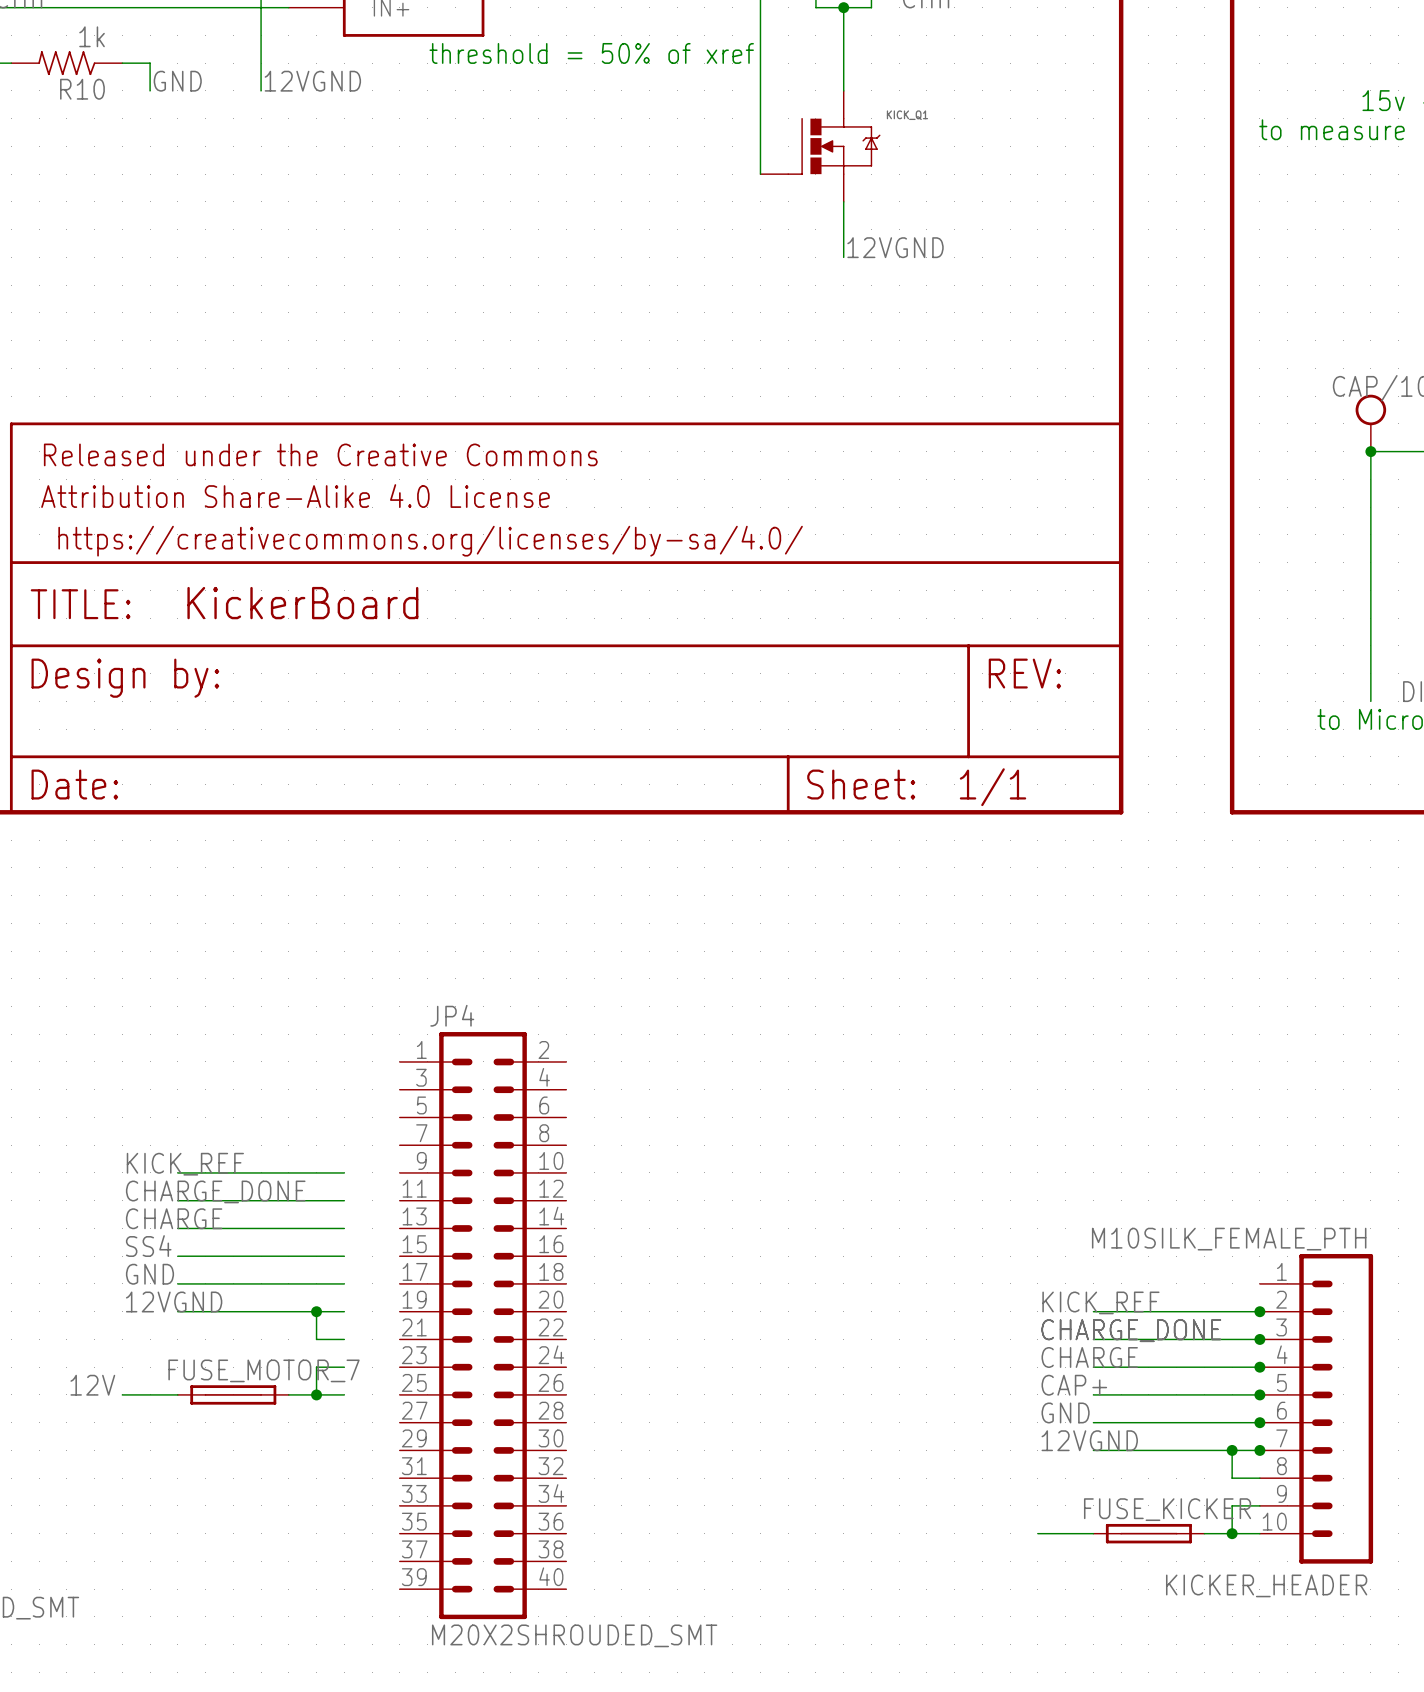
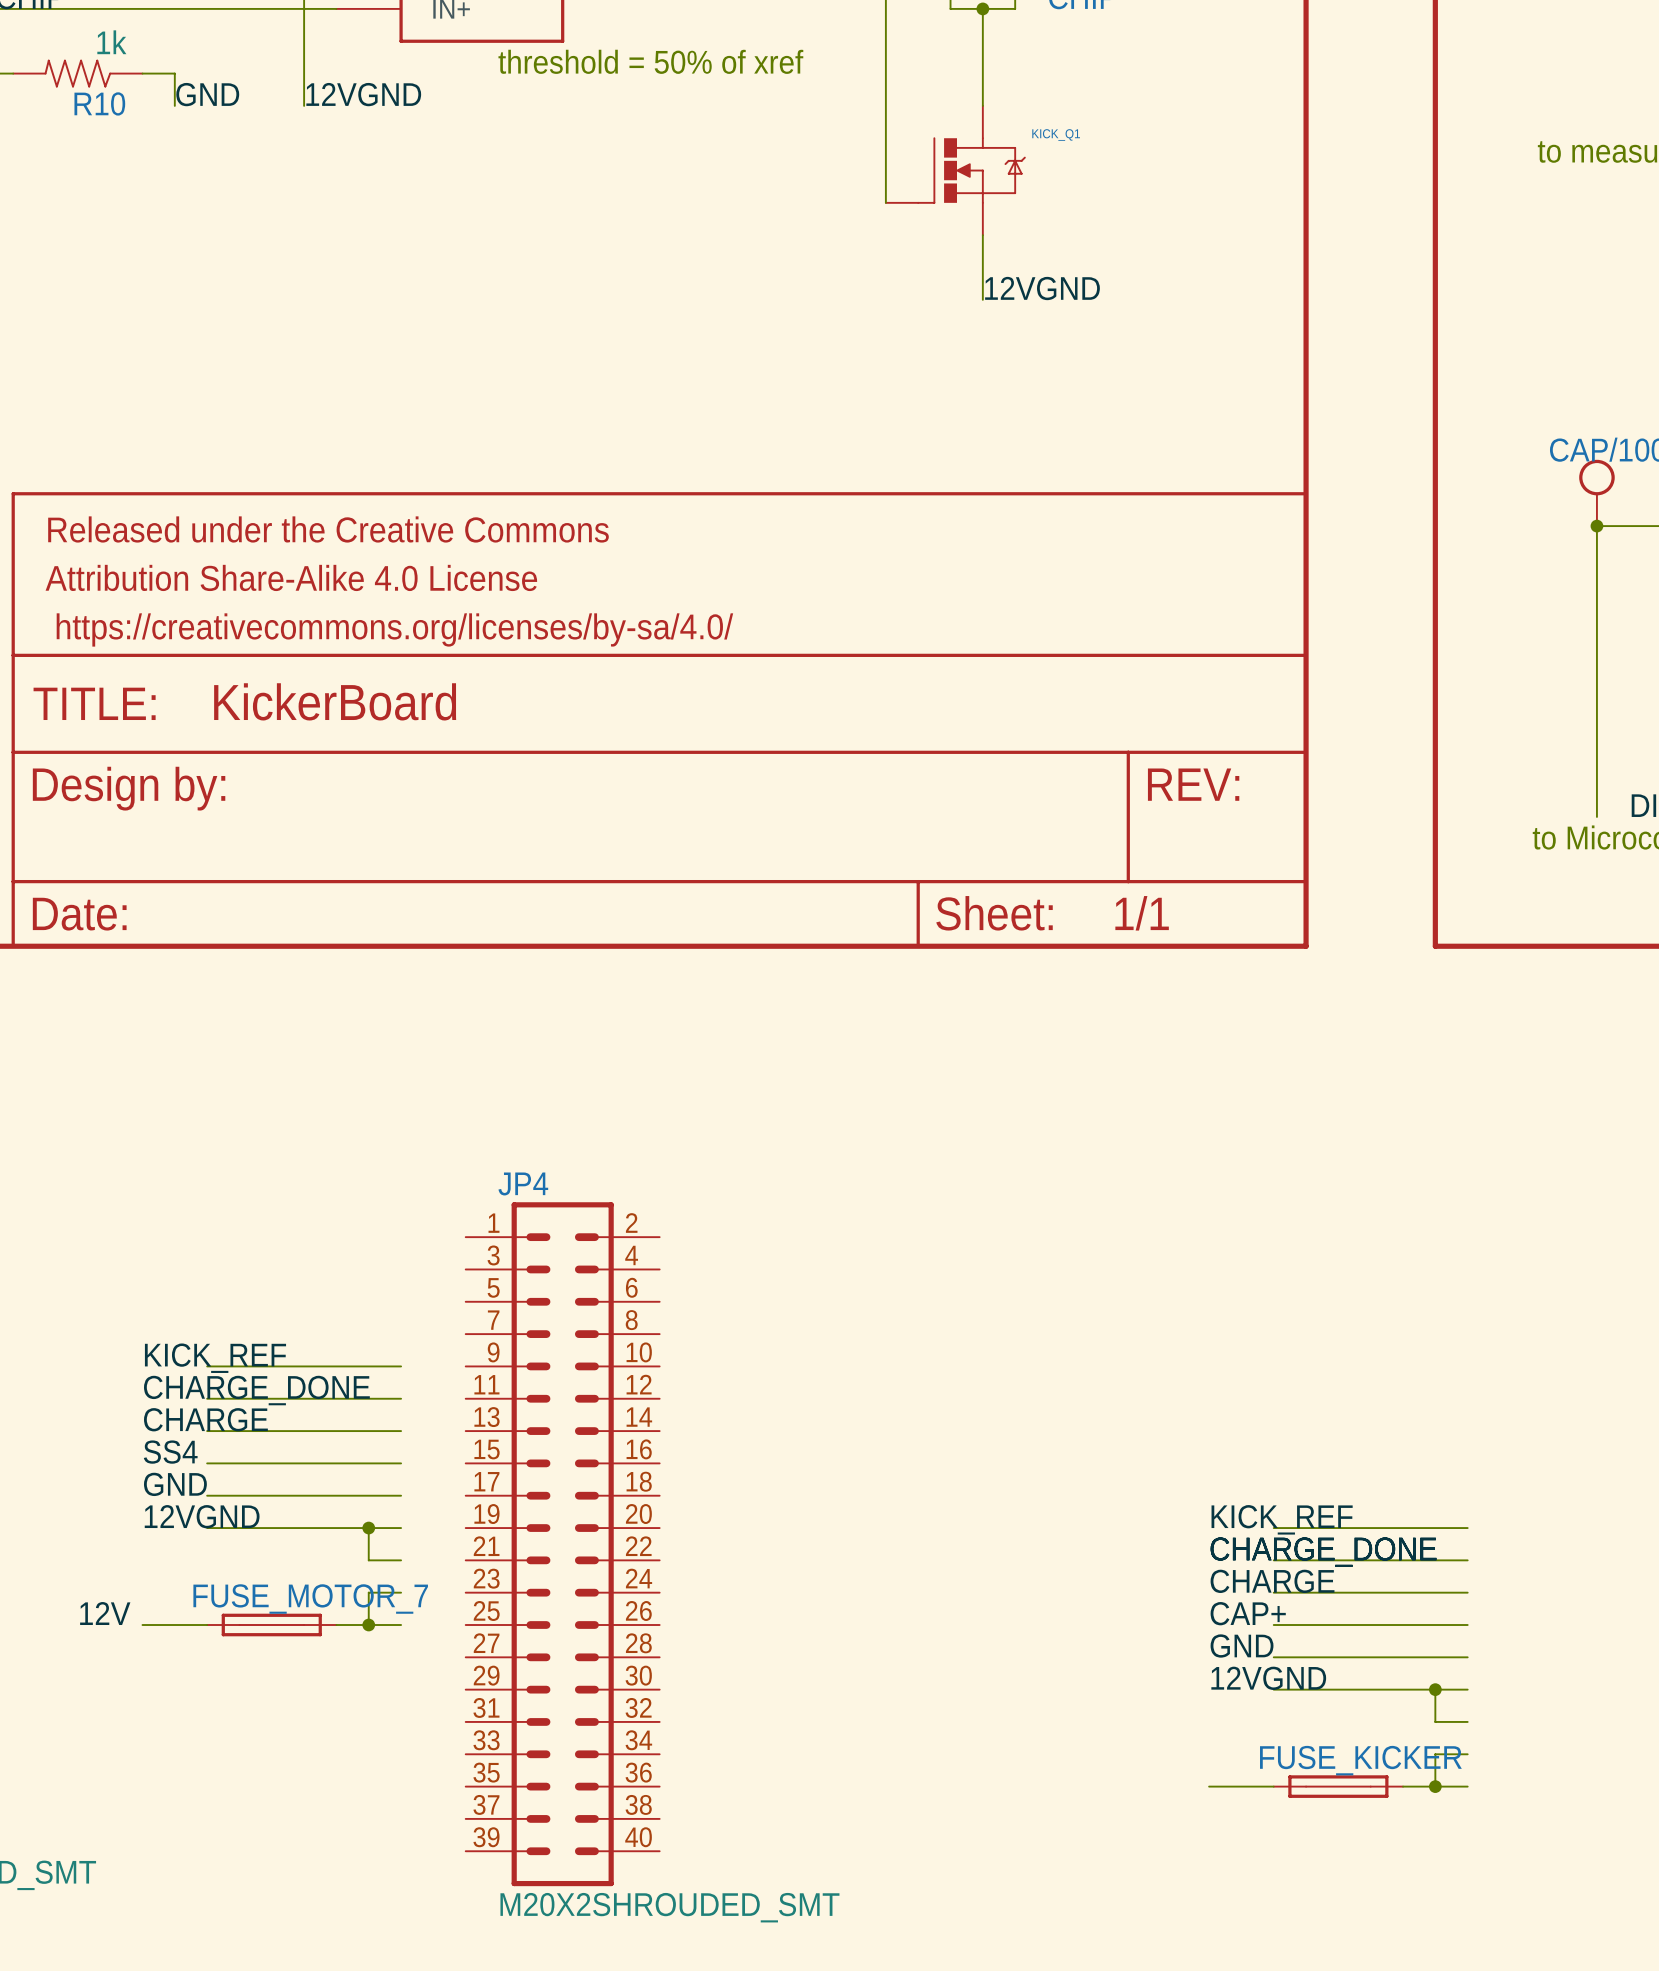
junction: (1259, 1311) -> none
junction: (1259, 1339) -> none
junction: (1259, 1367) -> none
junction: (1259, 1394) -> none
KICKER_HEADER: M10SILK_FEMALE_PTH (1316, 1408) -> none
junction: (1259, 1422) -> none
junction: (1259, 1450) -> none

